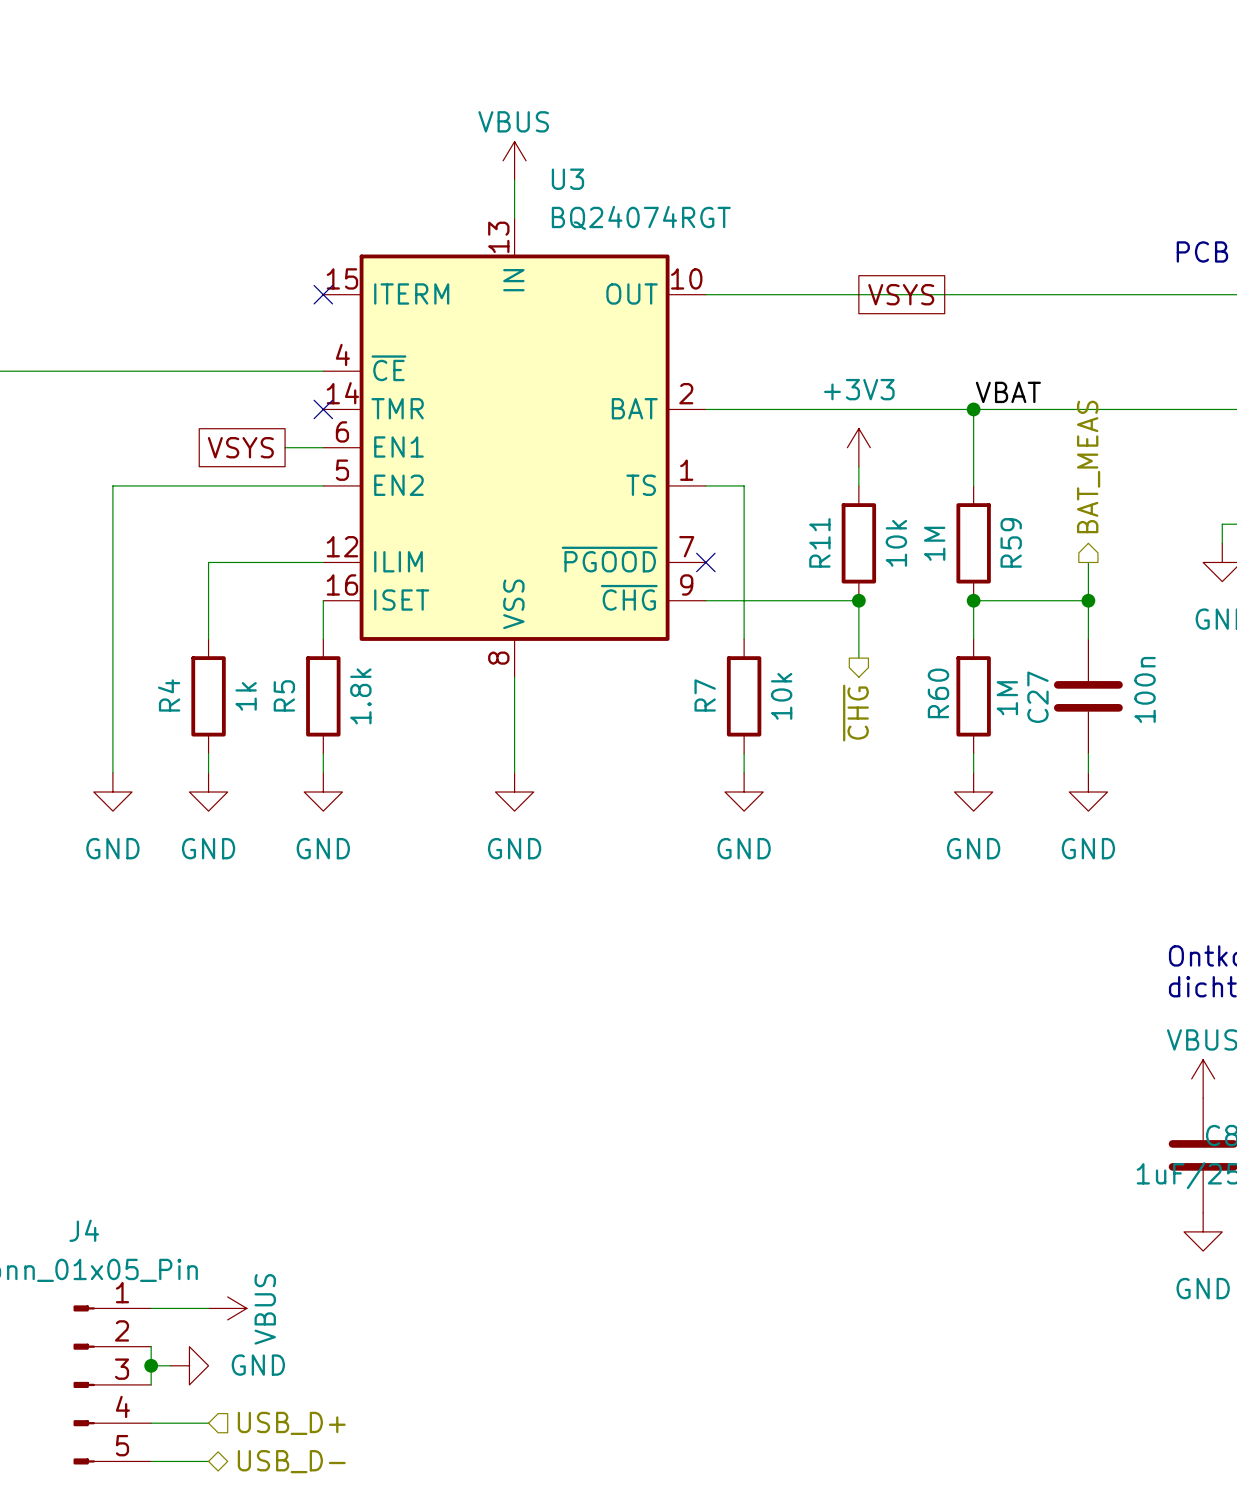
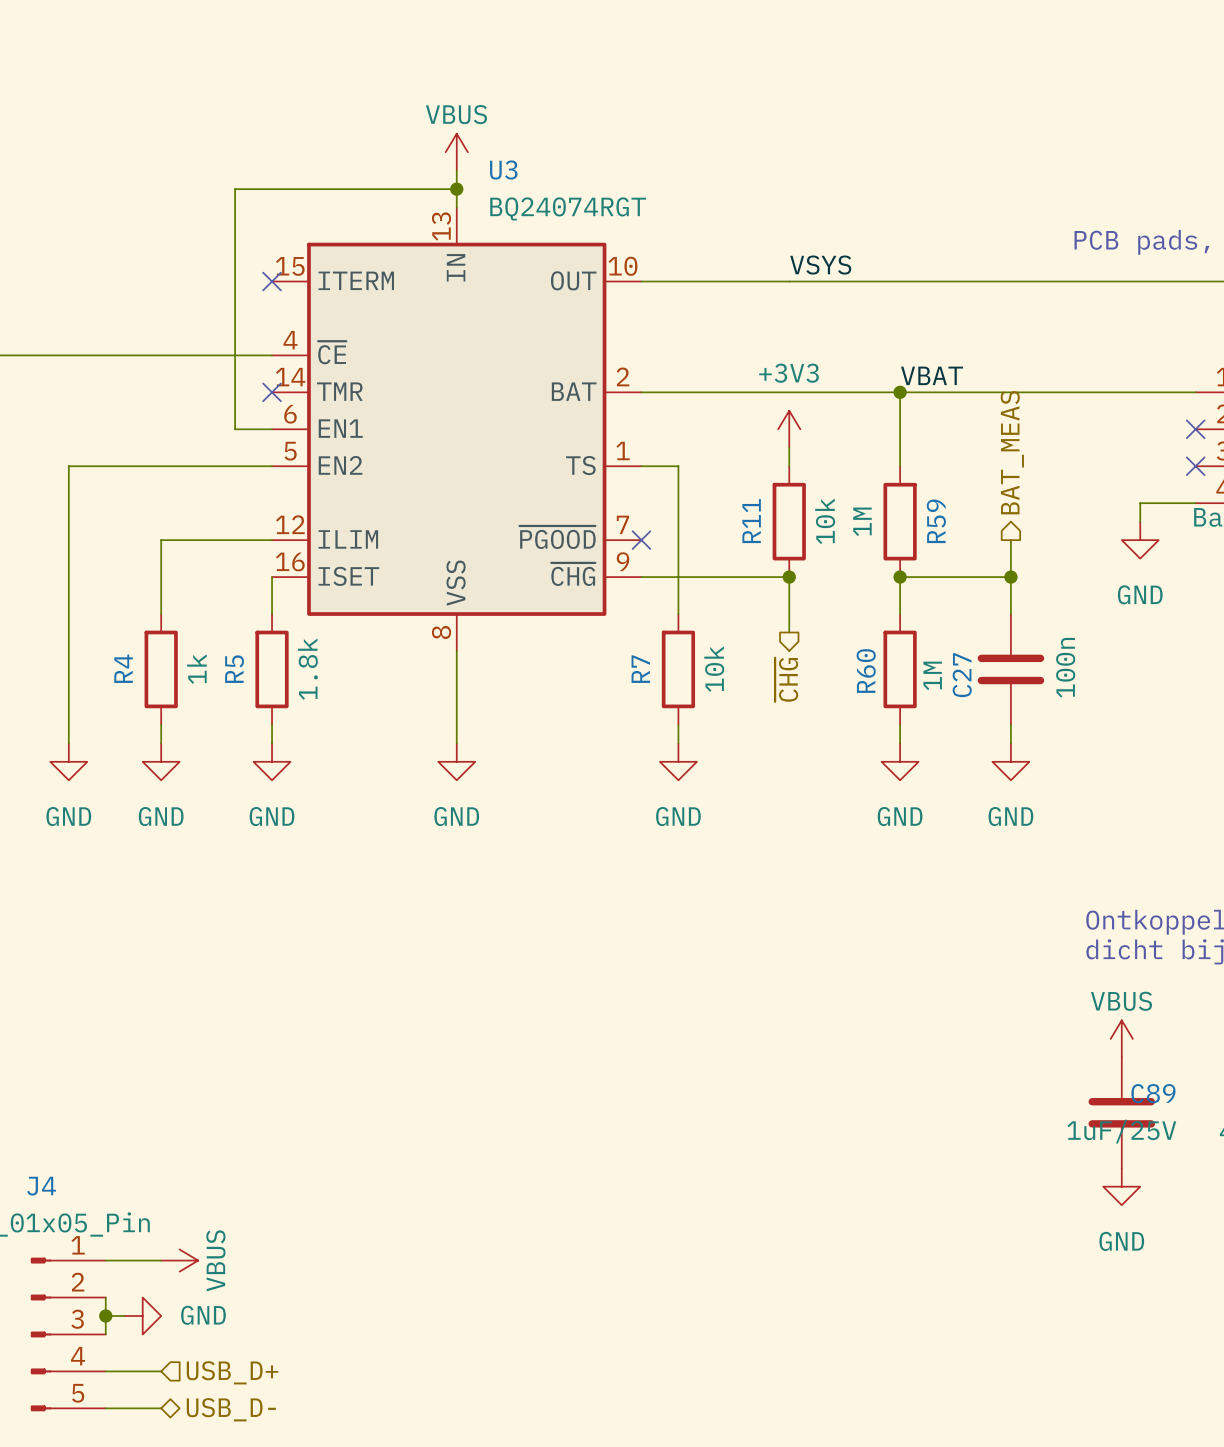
wire: none -> (456, 189) (235, 189) (235, 429)
junction: none -> (456, 189)
label: none -> VSYS (820, 265)
global label: VSYS (901, 294) -> none
global label: VSYS (240, 447) -> none

